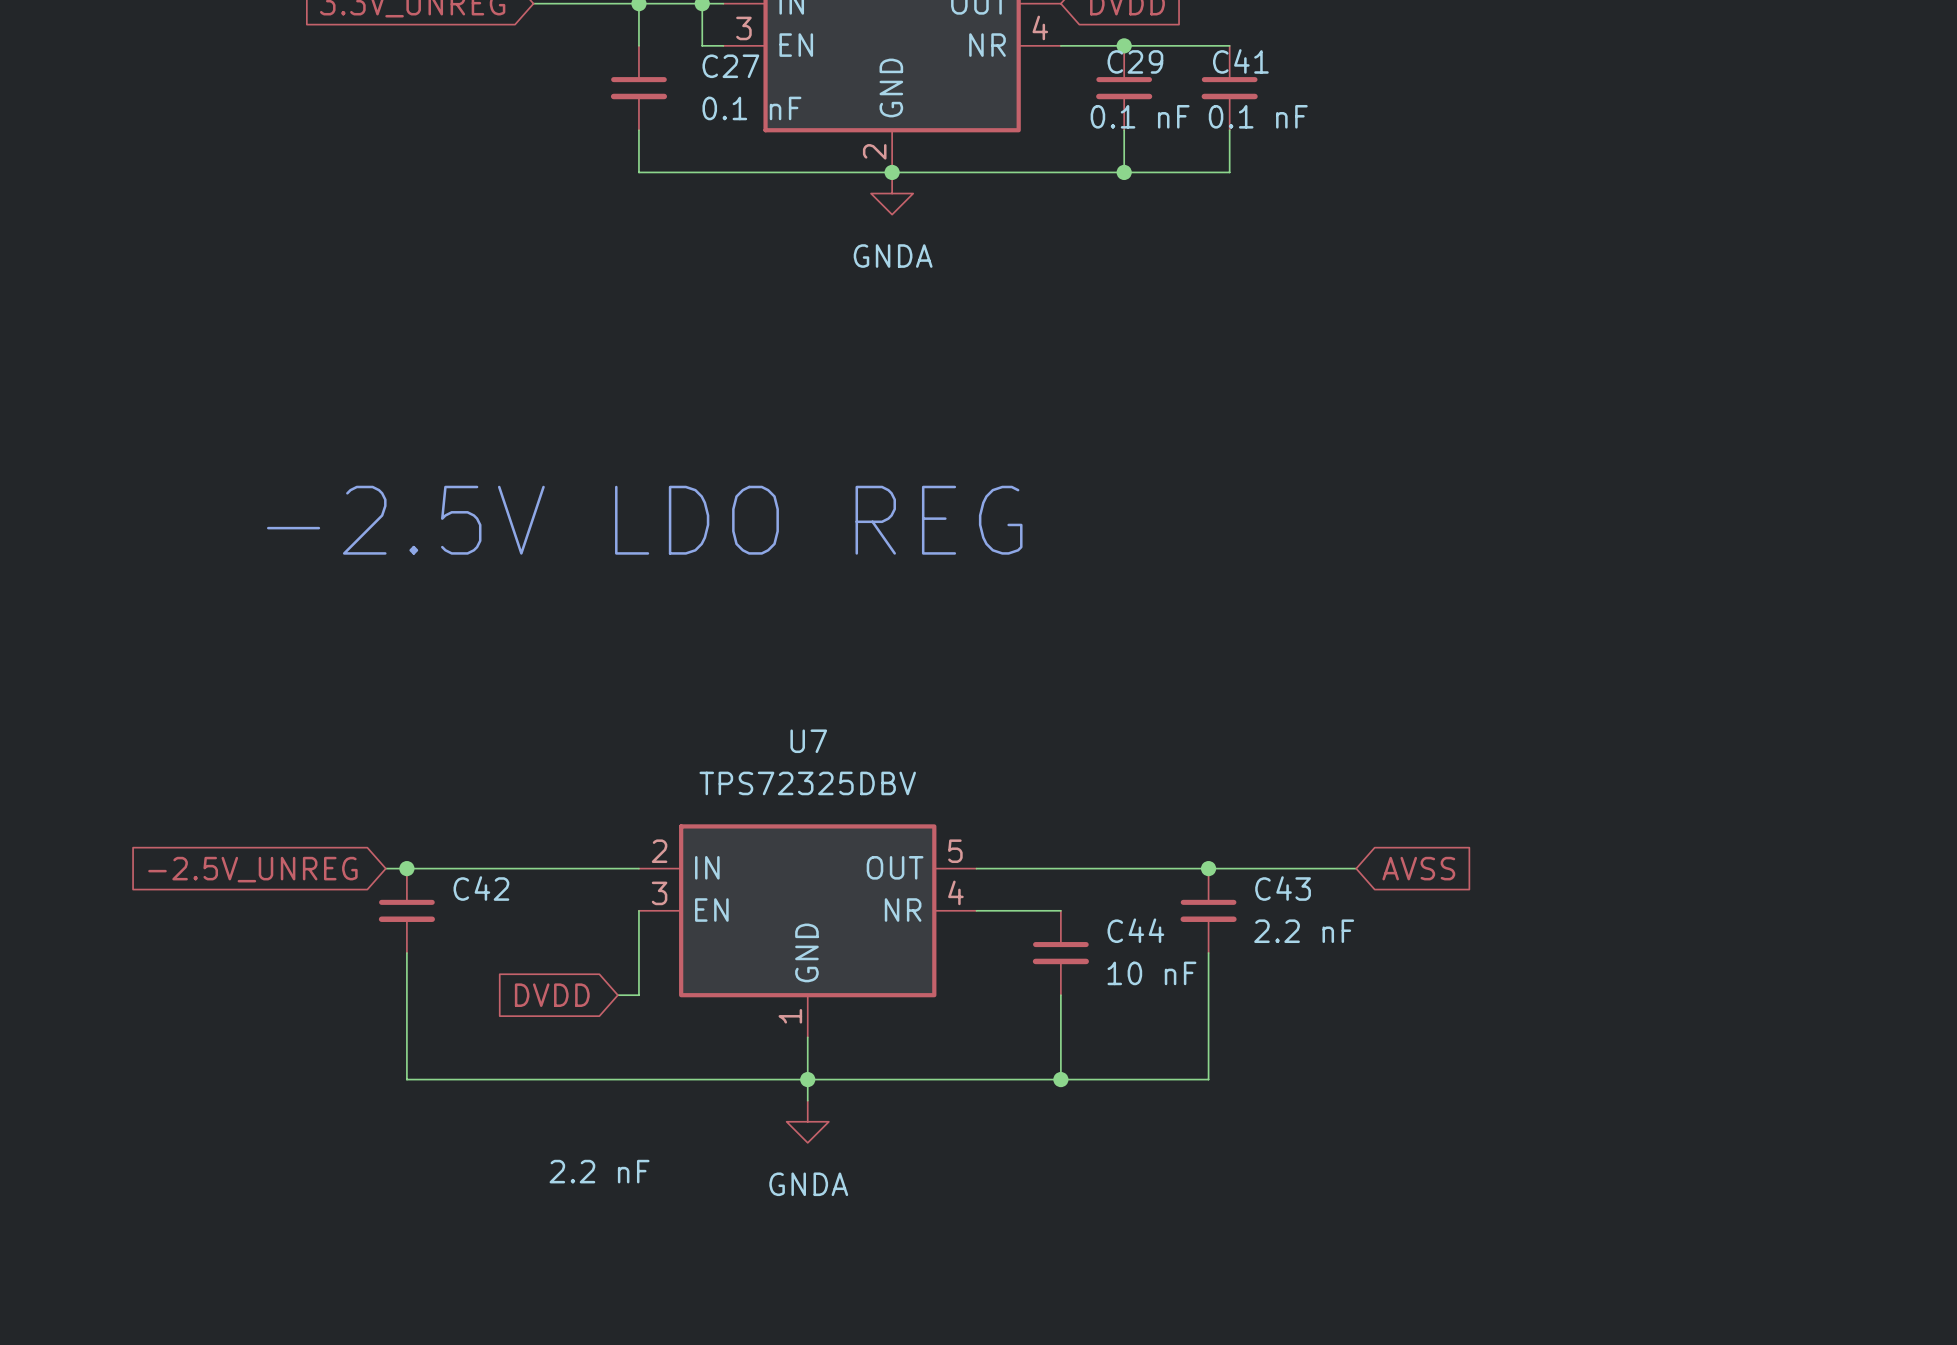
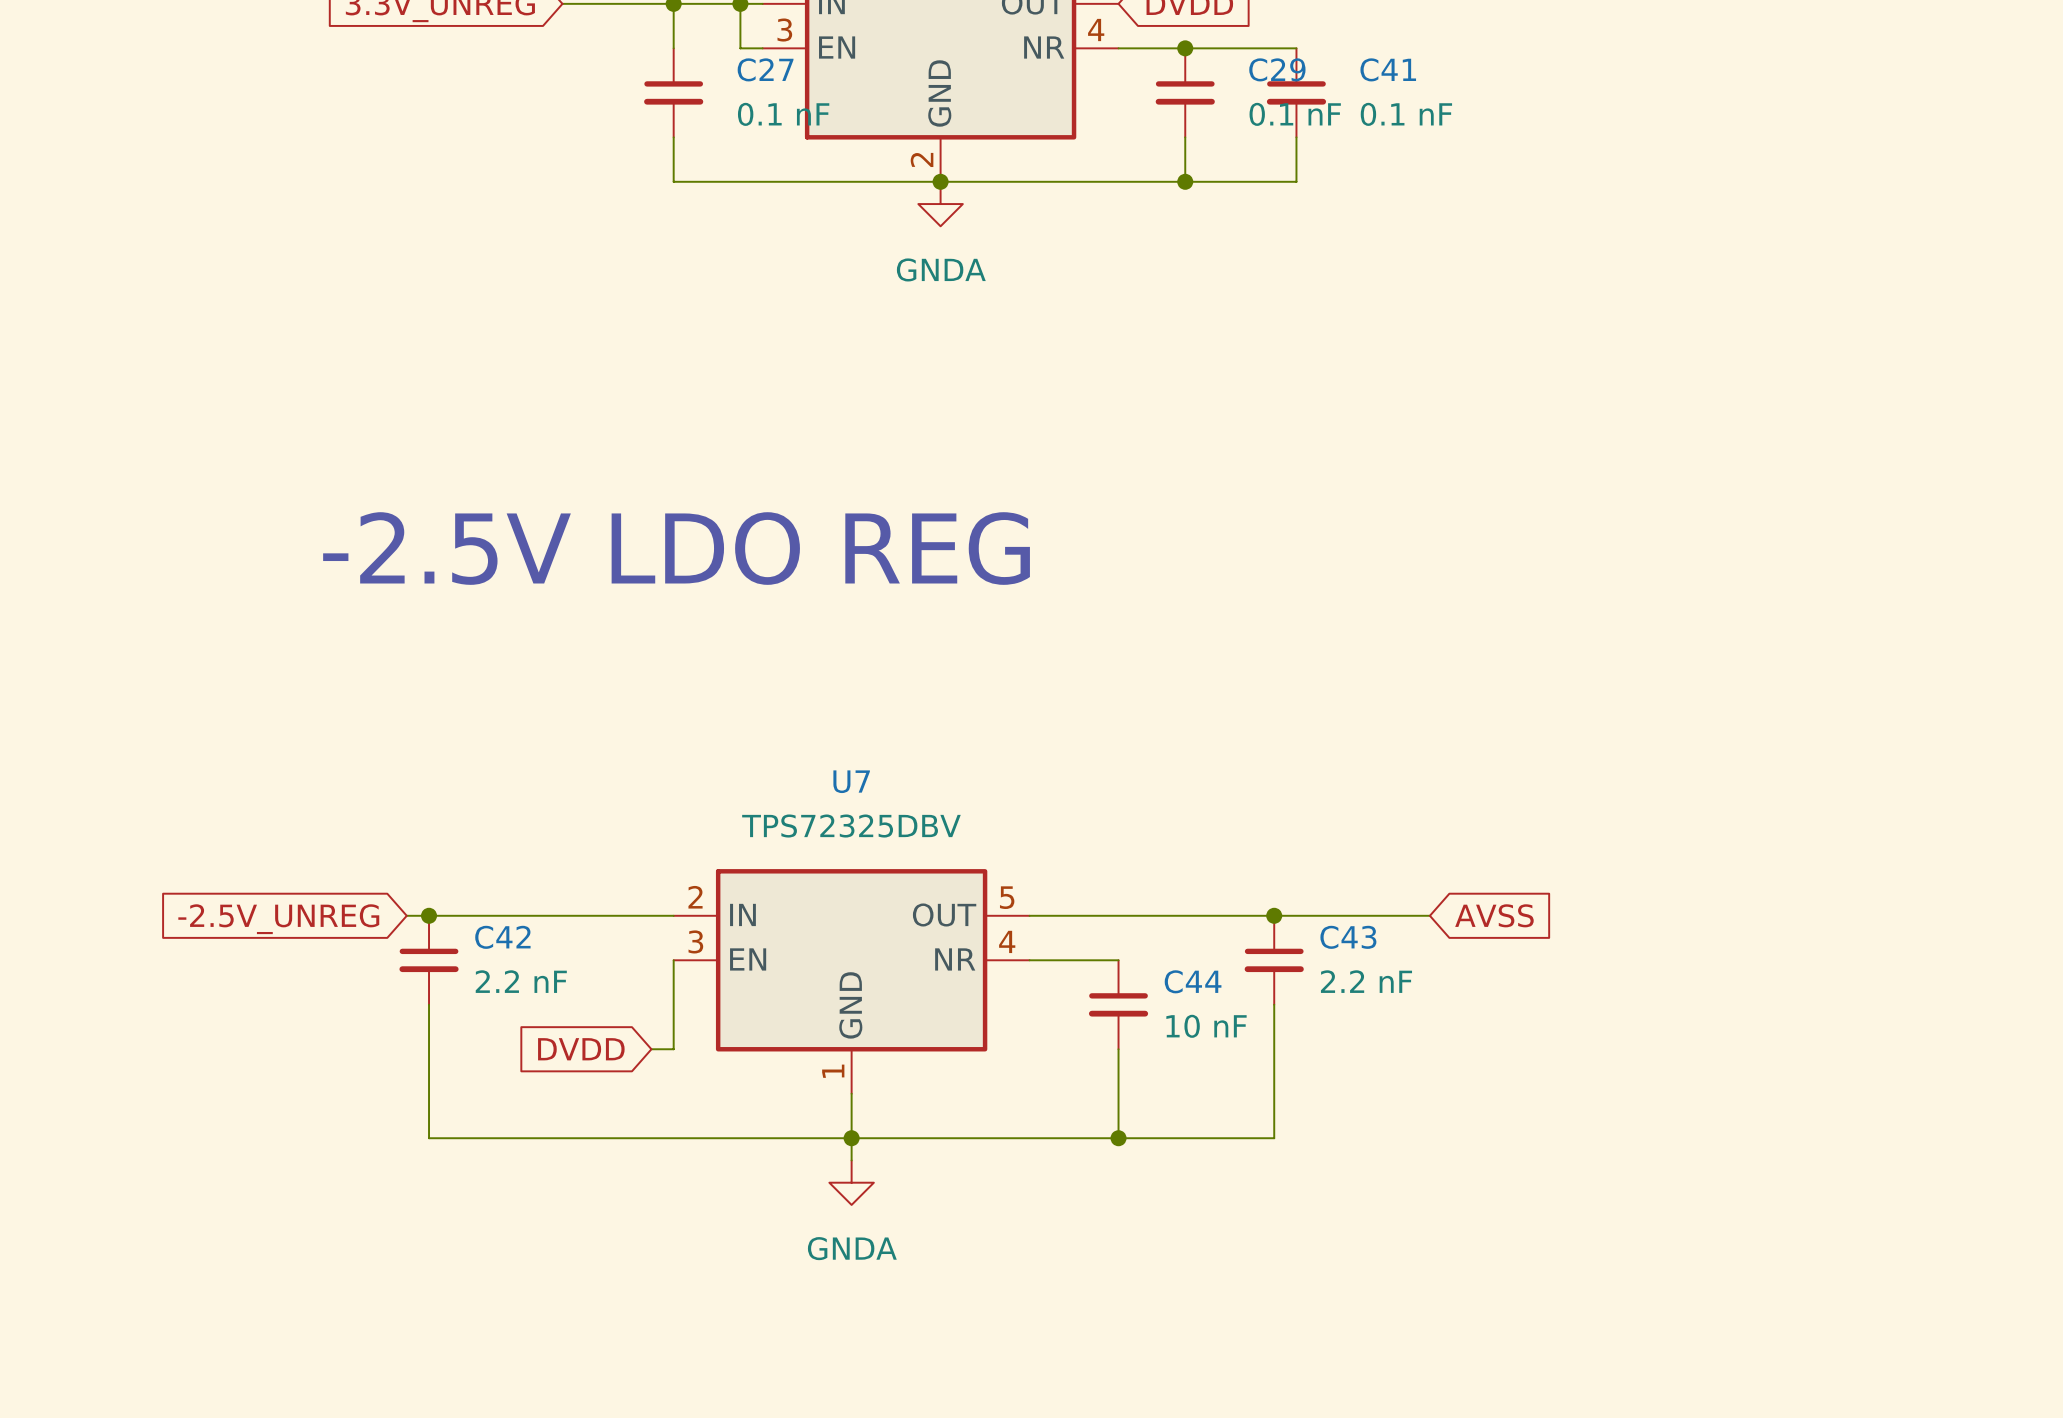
C29 name position: C29 (1135, 61) -> C29 (1277, 69)
C41 name position: C41 (1240, 61) -> C41 (1388, 69)
C29 value position: 0.1 nF (1140, 116) -> 0.1 nF (1295, 114)
C41 value position: 0.1 nF (1258, 116) -> 0.1 nF (1406, 114)
C42 value position: 2.2 nF (599, 1171) -> 2.2 nF (521, 981)

